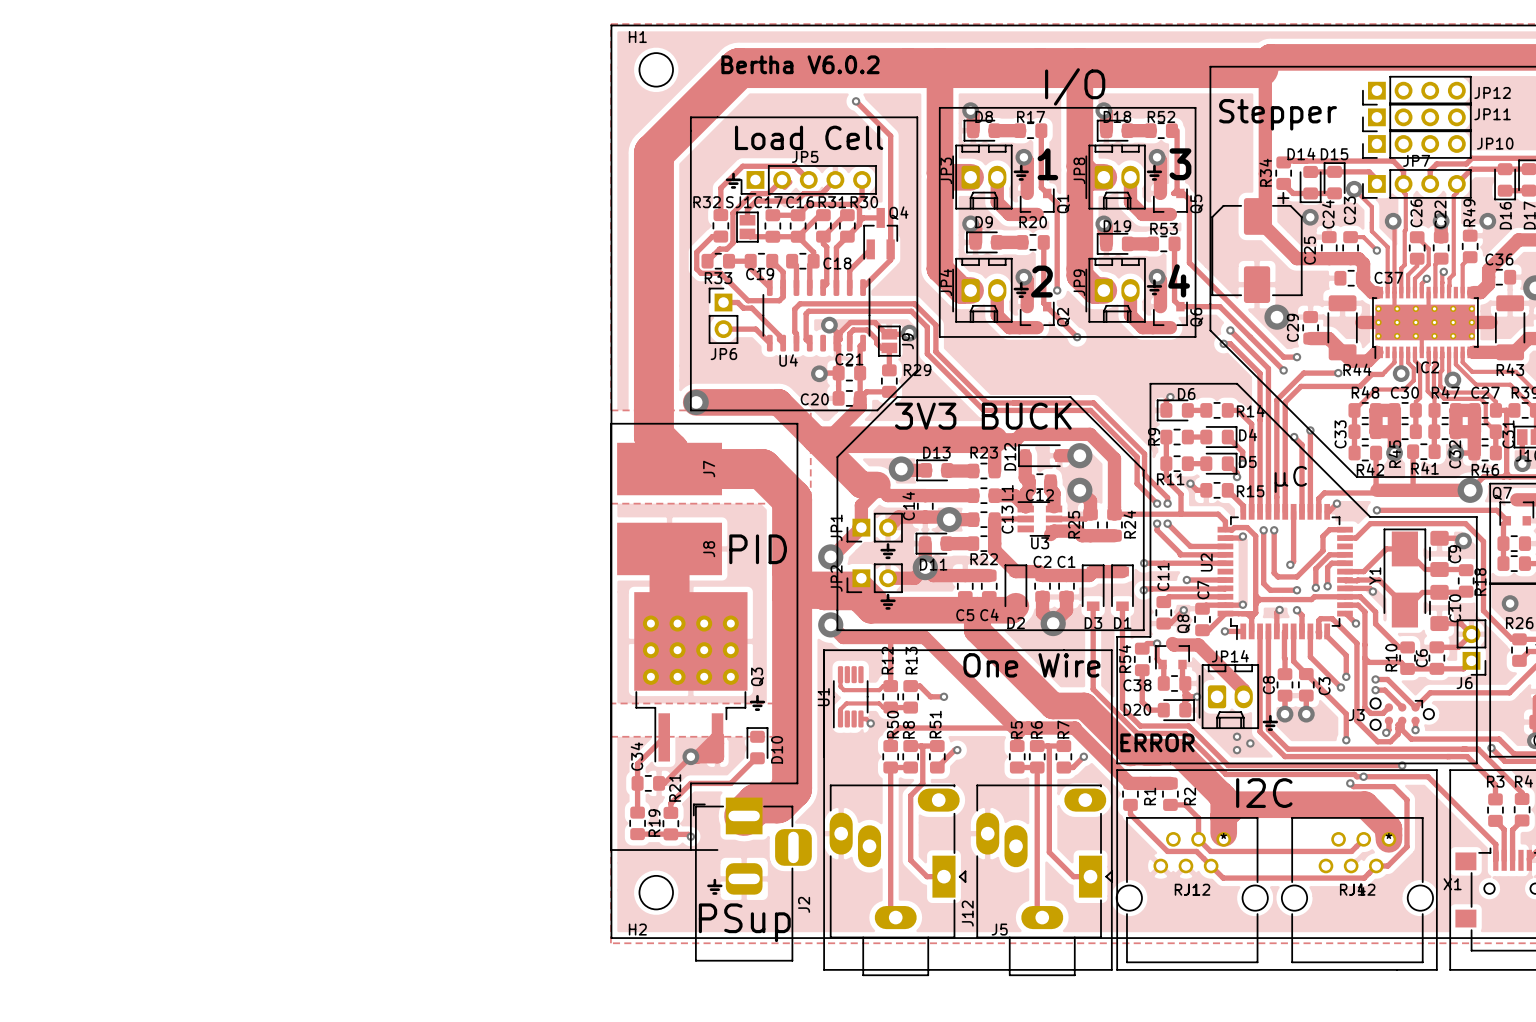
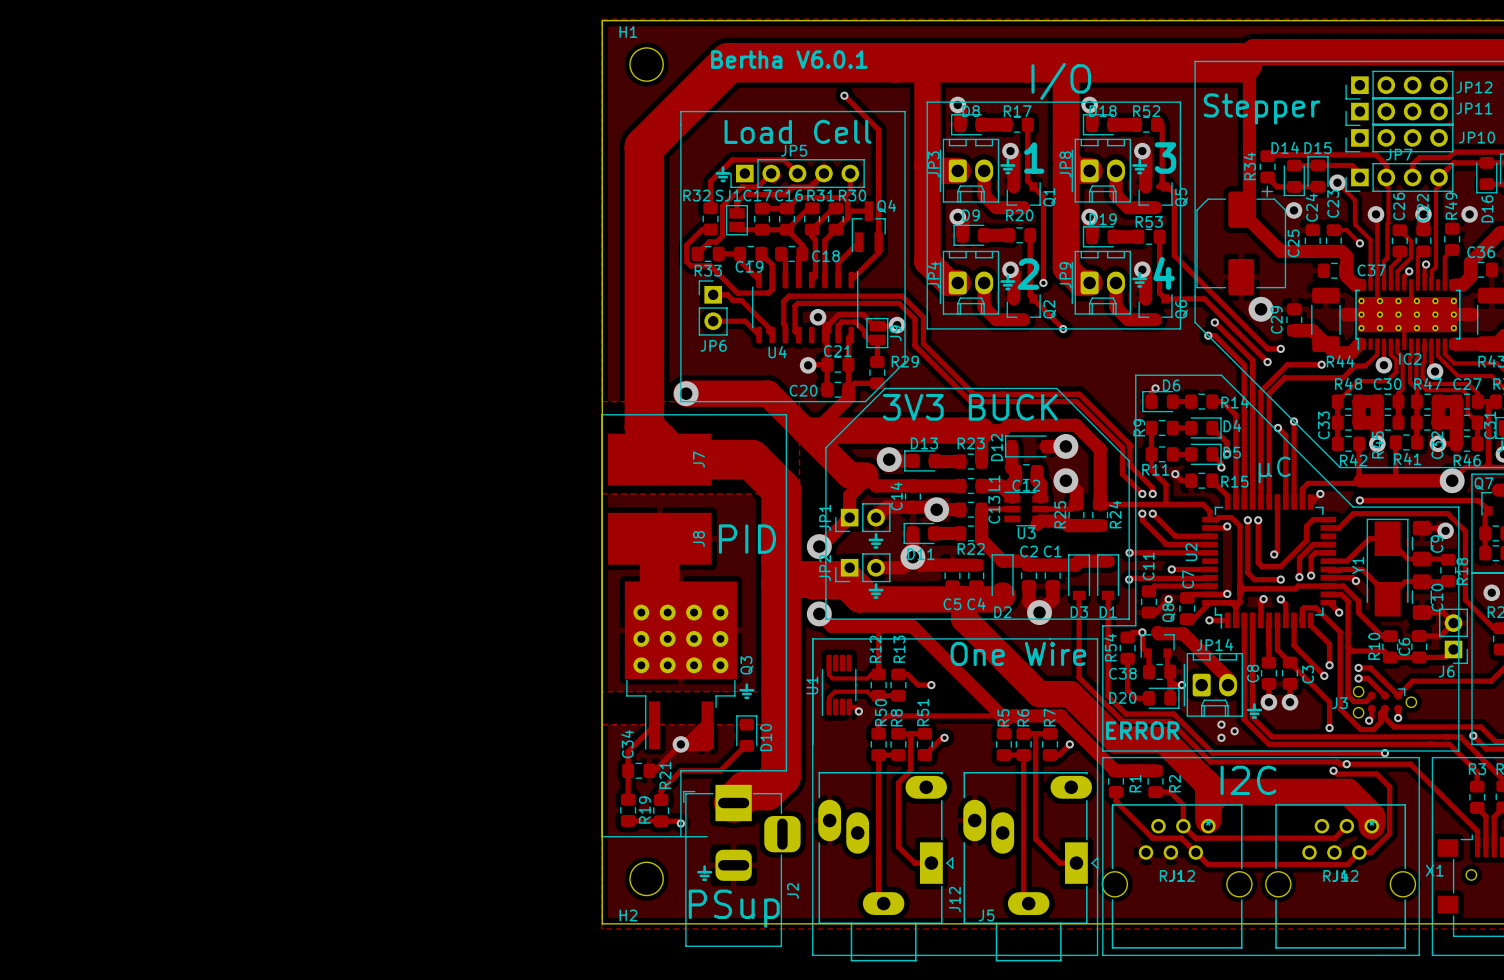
text: Bertha V6.0.2 (800, 64) -> Bertha V6.0.1 (789, 59)

